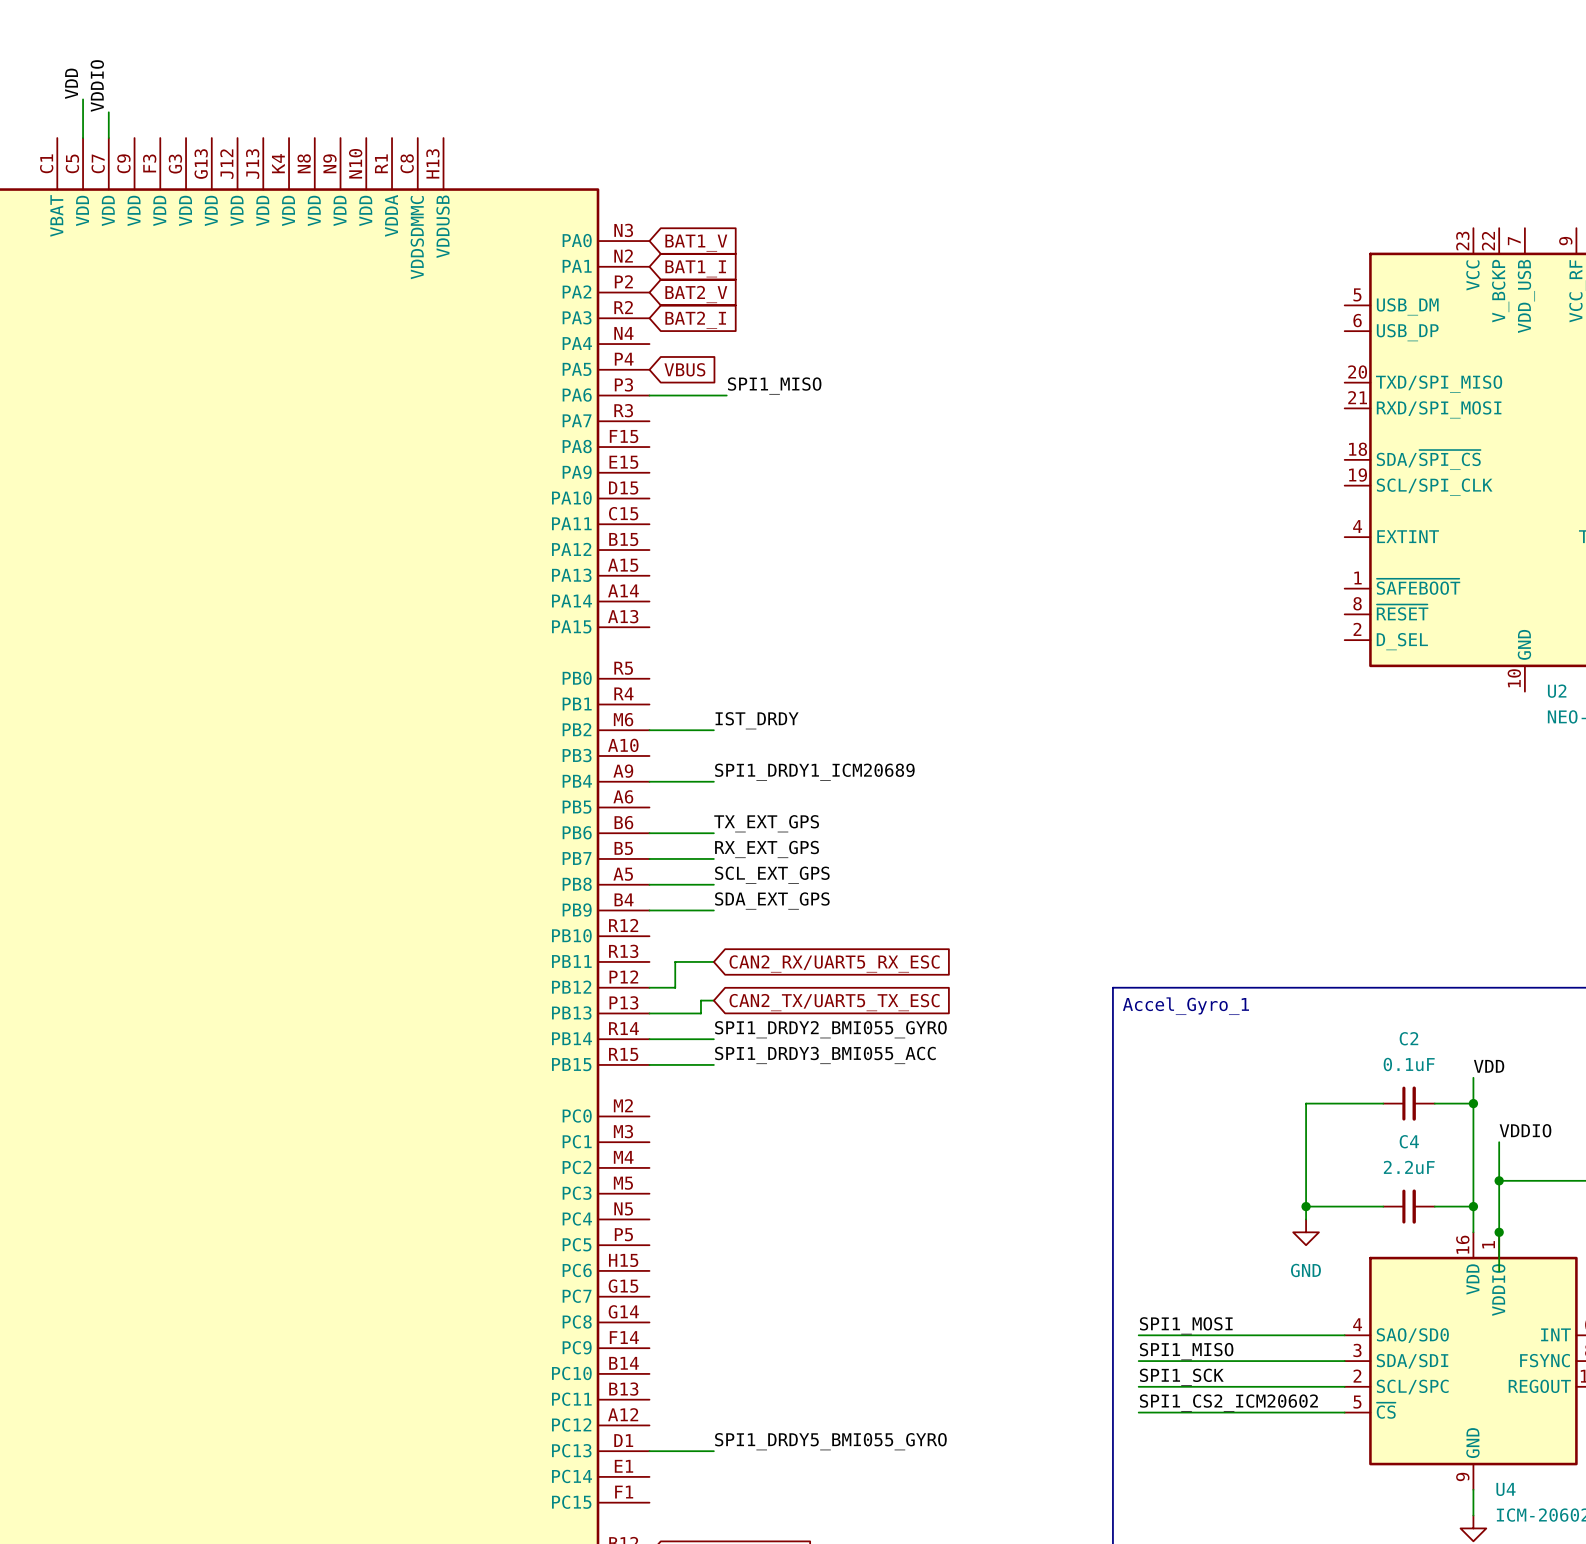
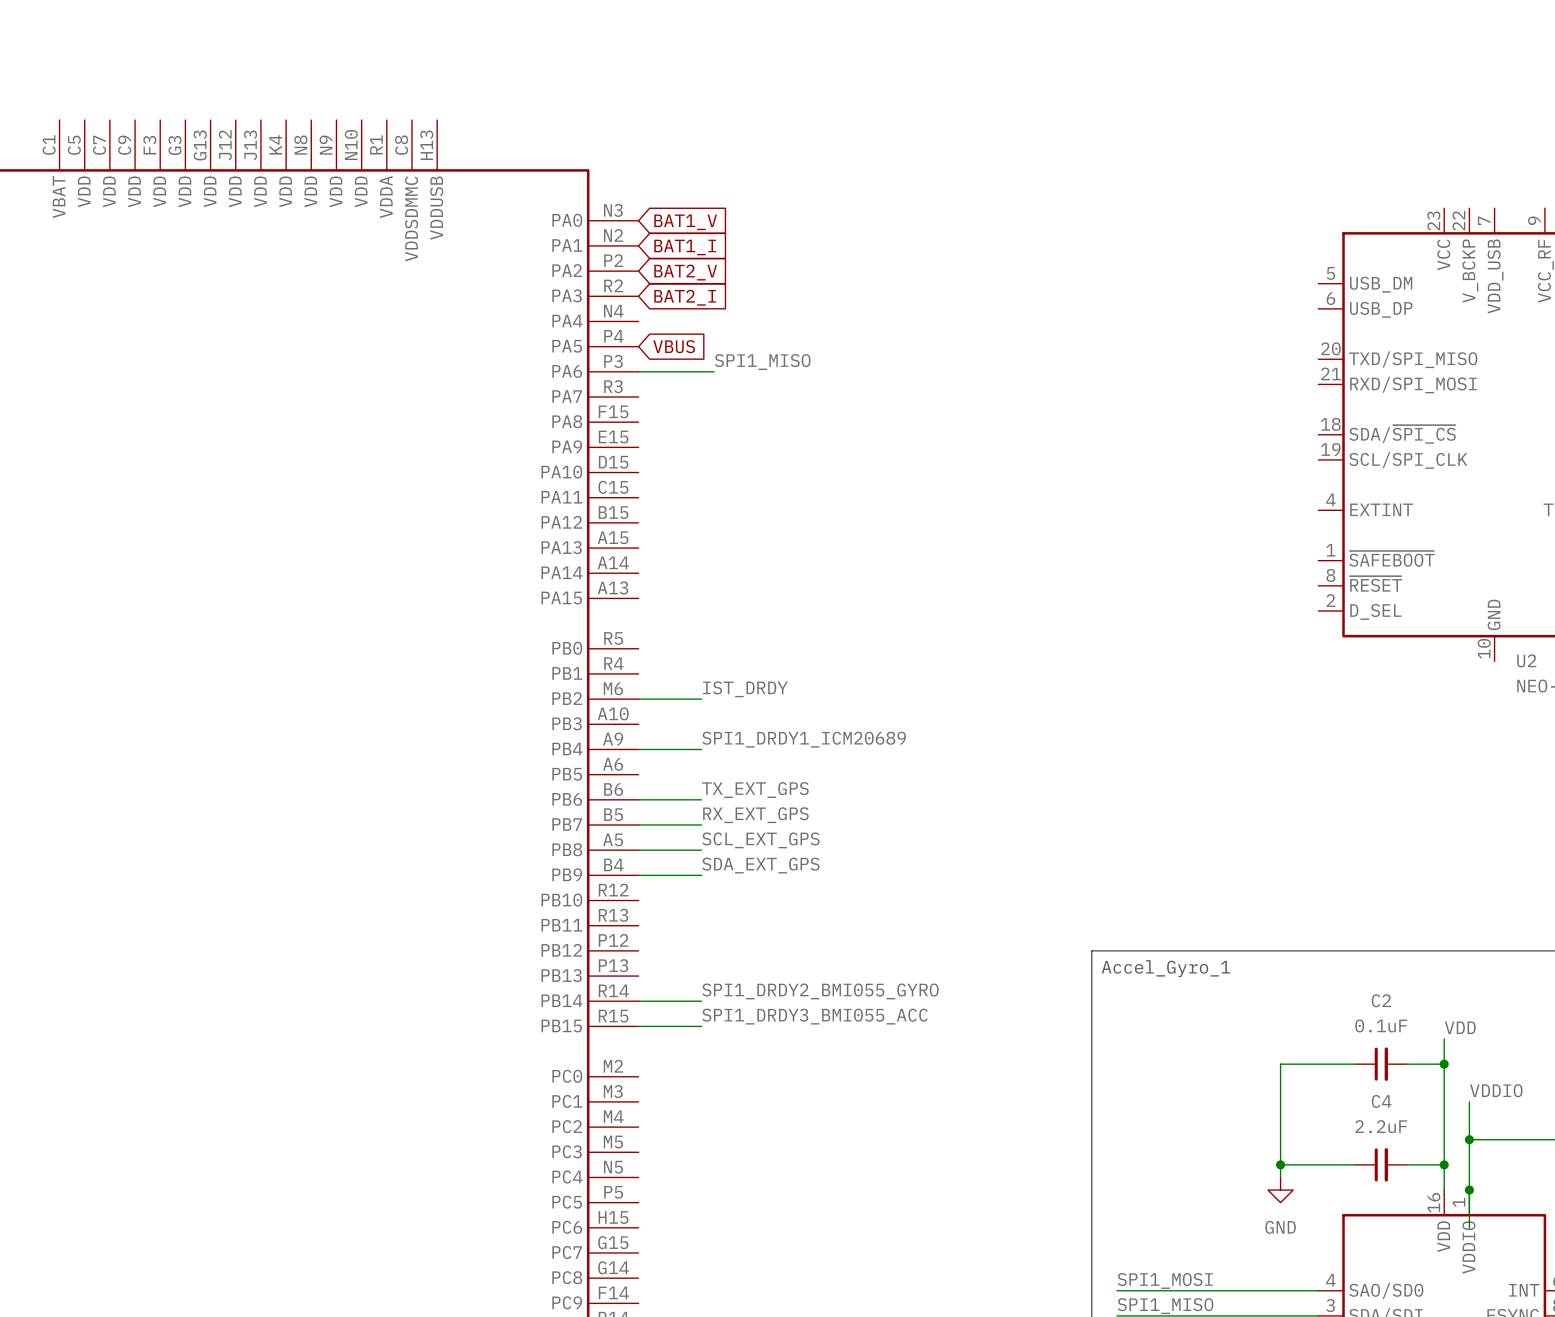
label: VDD (71, 83) -> none
label: VDDIO (97, 85) -> none
wire: (83, 99) (83, 138) -> none
wire: (108, 112) (108, 138) -> none
wire: (713, 961) (675, 961) (675, 987) (649, 987) -> none
global label: CAN2_RX/UART5_RX_ESC (834, 963) -> none
wire: (713, 1000) (700, 1000) (700, 1013) (649, 1013) -> none
global label: CAN2_TX/UART5_TX_ESC (834, 1002) -> none

